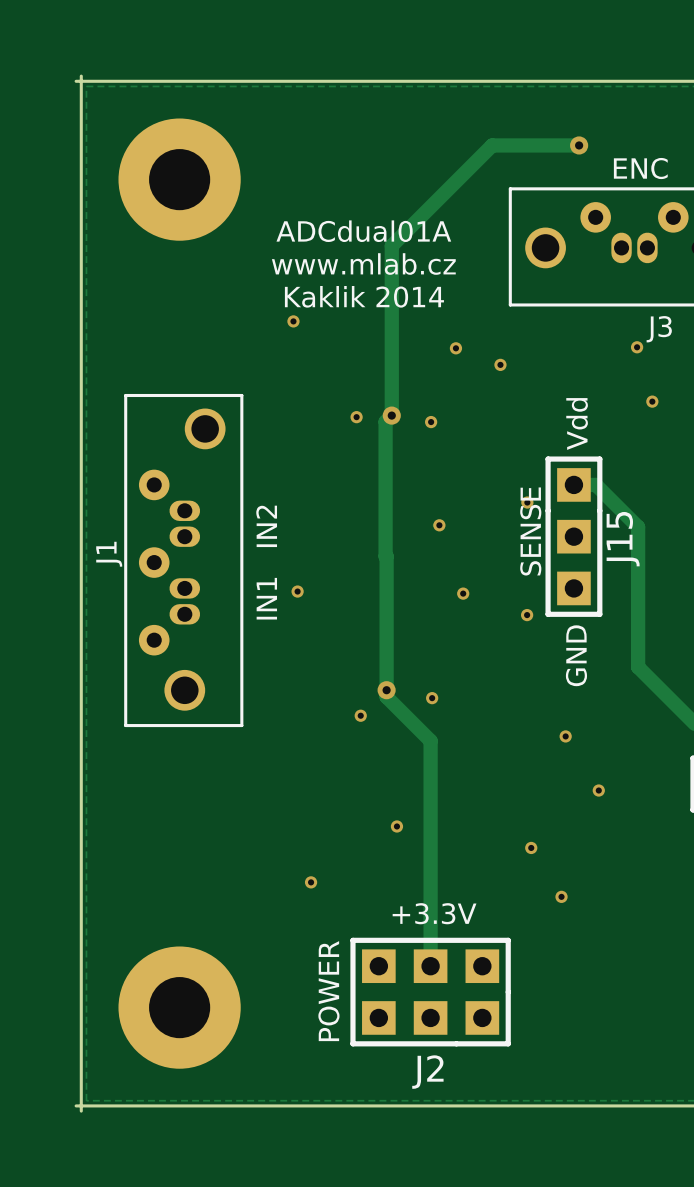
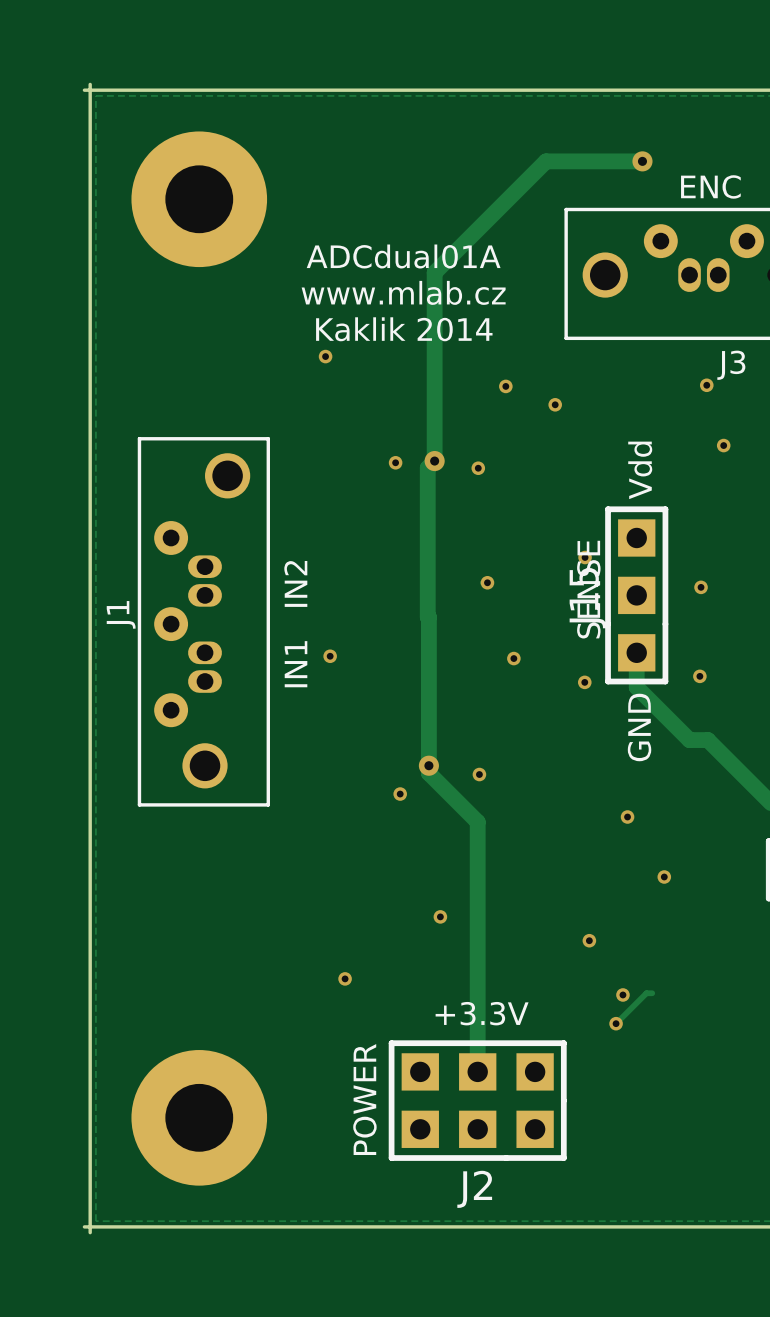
track: (573, 484) (595, 484) (638, 527) (638, 667) -> (636, 652) (636, 687) (689, 740) (707, 740)
via: none -> (701, 587)
J15 rotation: 0° (573, 536) -> 180° (636, 595)
via: none -> (699, 676)
track: none -> (652, 993) (646, 993) (616, 1023)
via: none -> (616, 1023)

